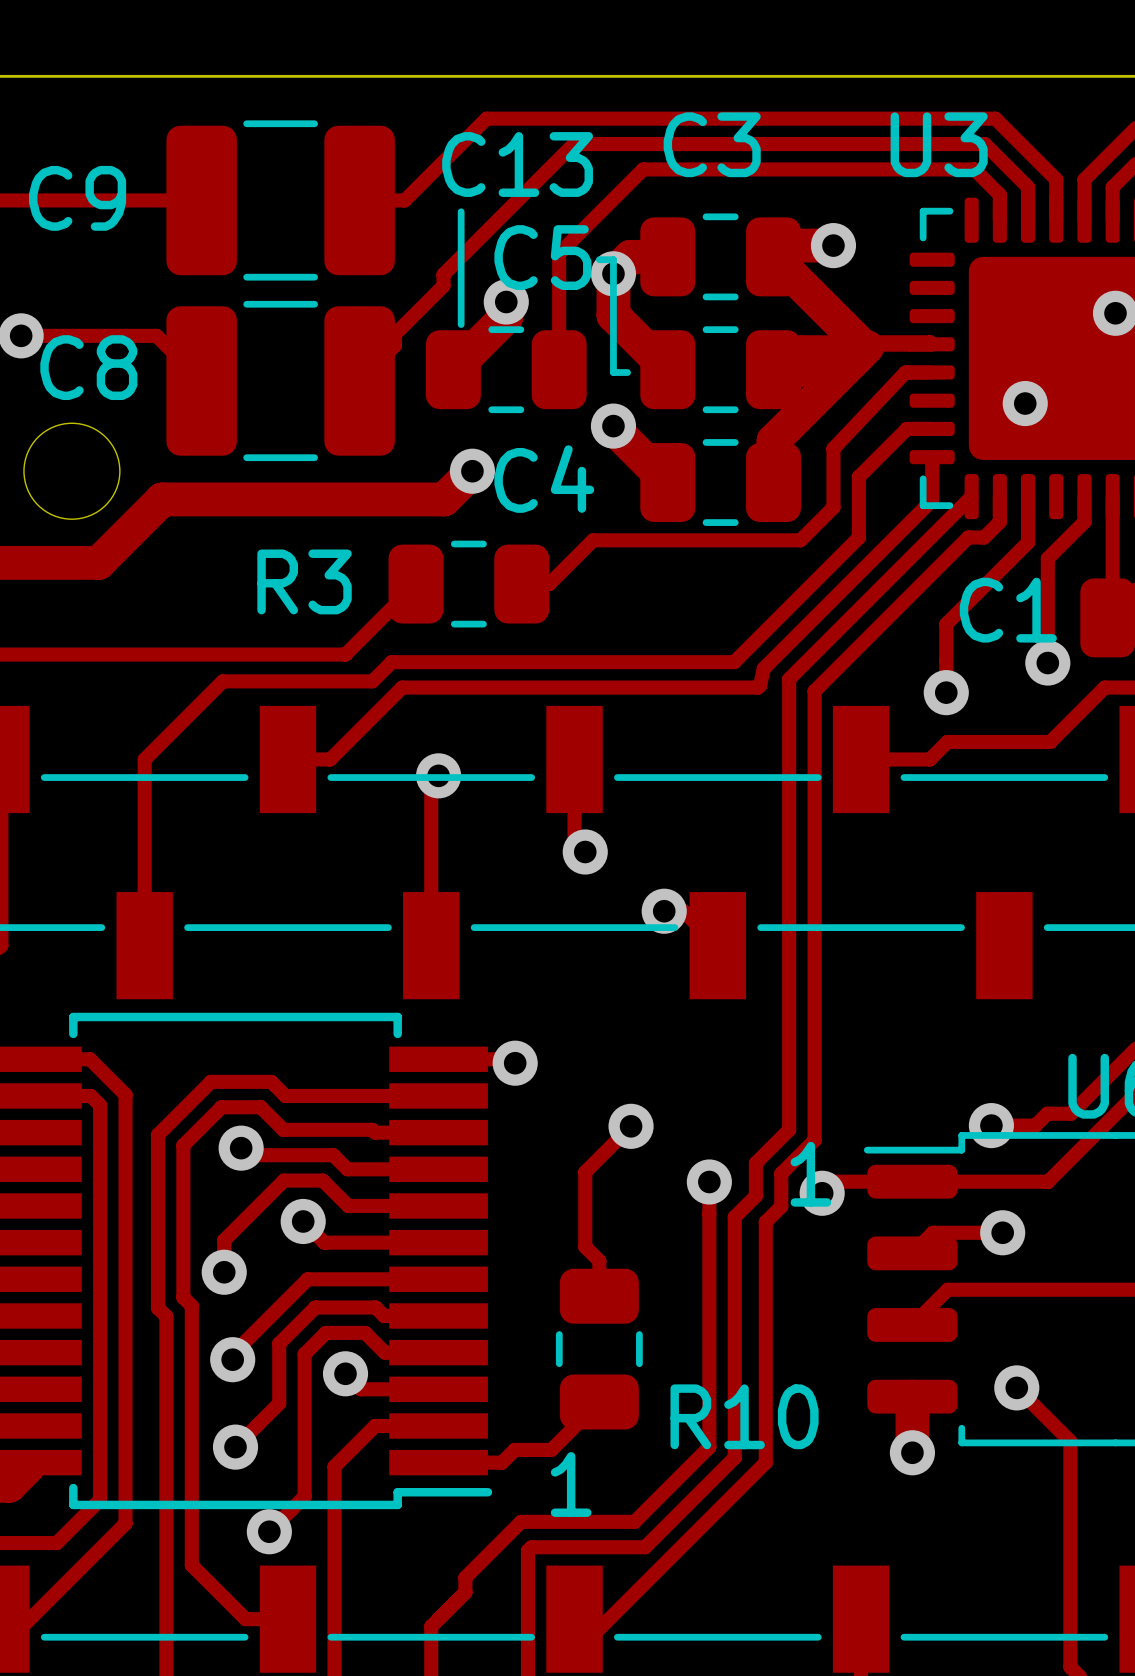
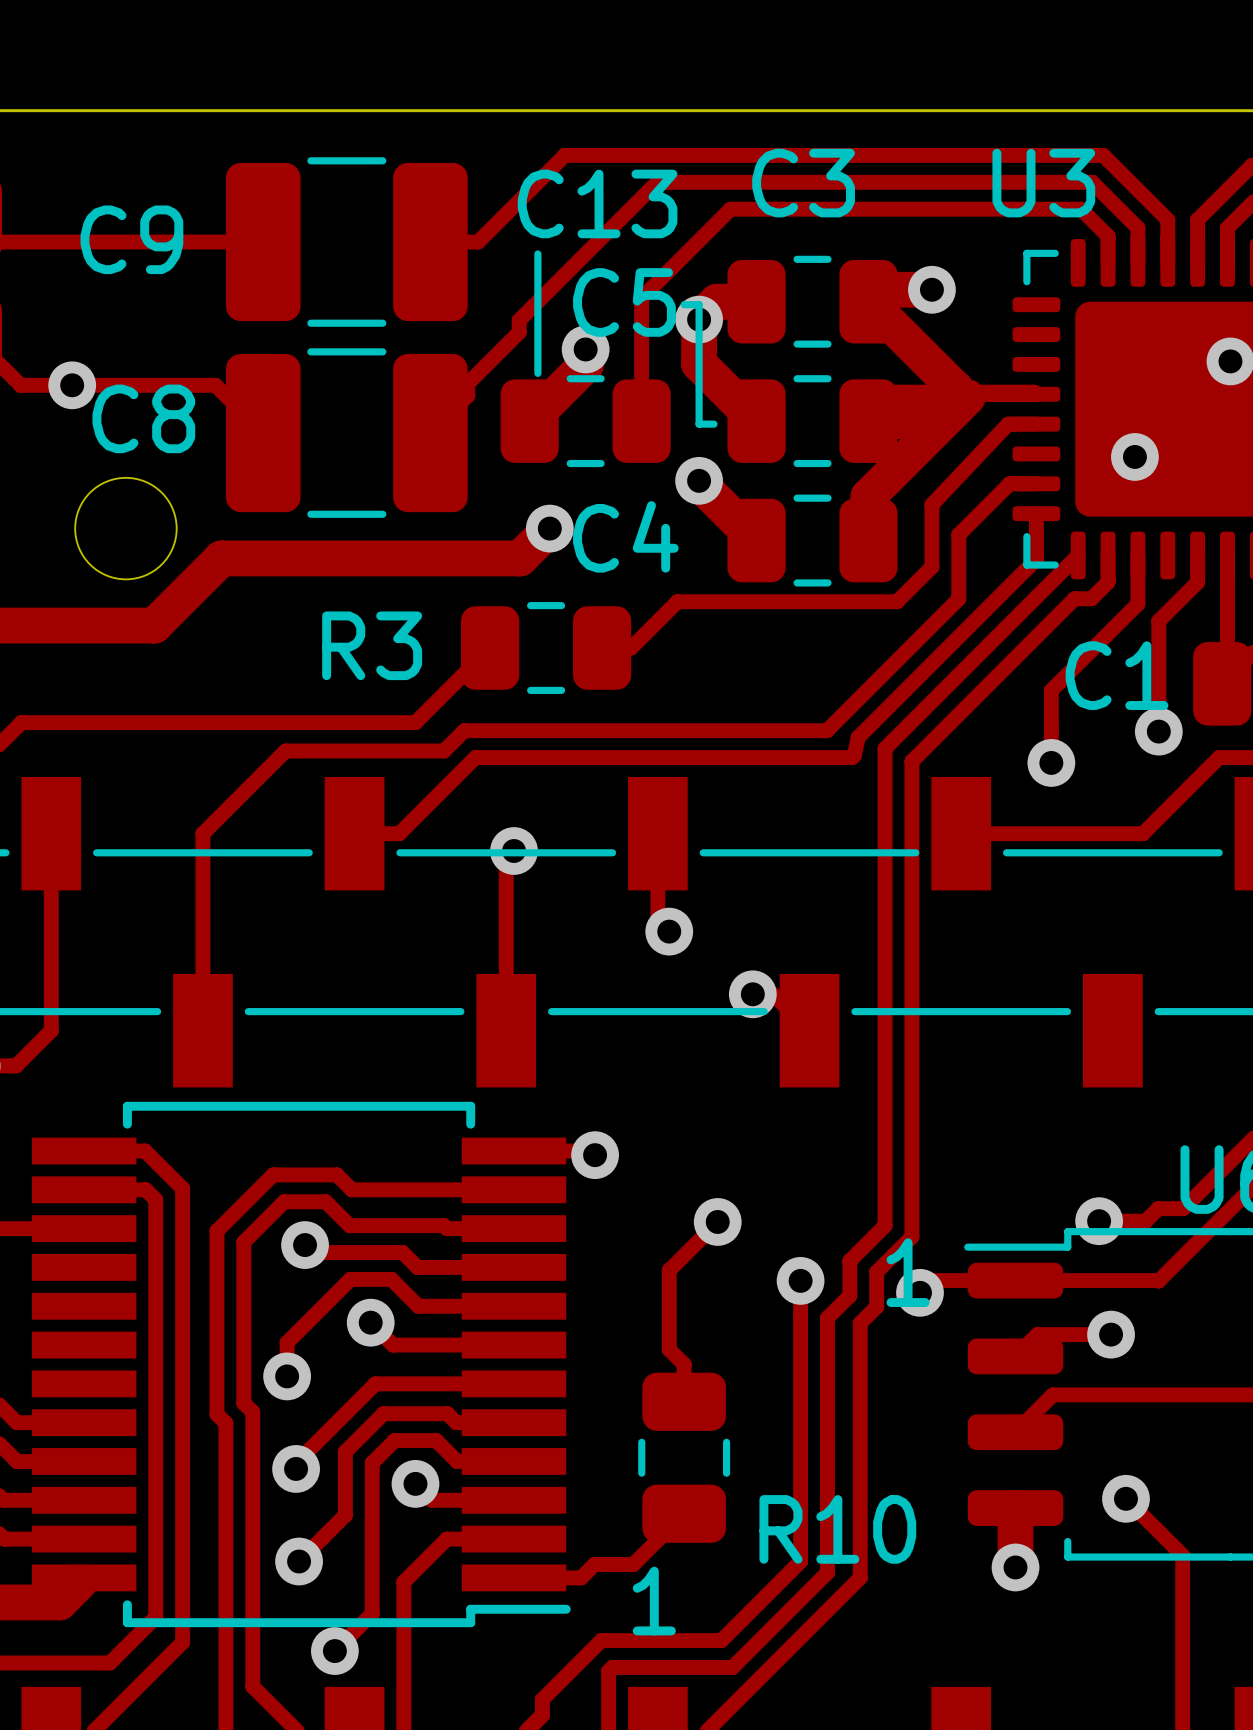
track: (1050, 742) (947, 742) (929, 759) -> (1161, 815) (1143, 833) (1034, 833)

